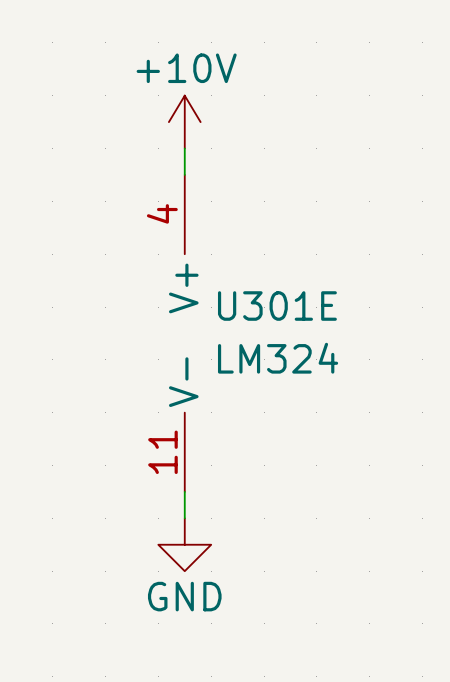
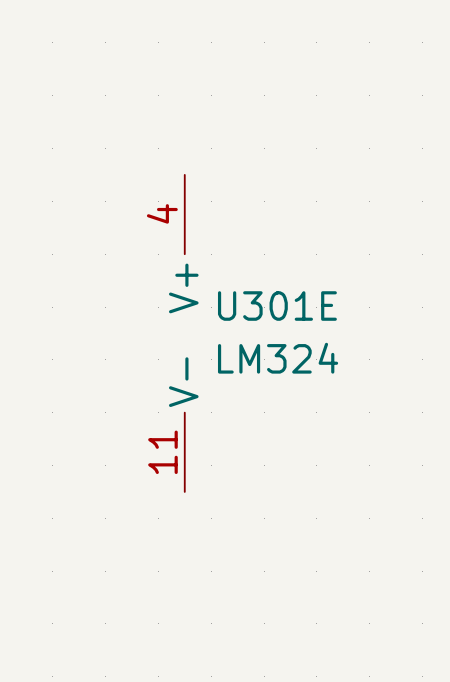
power symbol: +10V (184, 122) -> none
wire: (184, 148) (184, 174) -> none
wire: (184, 491) (184, 518) -> none
power symbol: GND (184, 544) -> none

